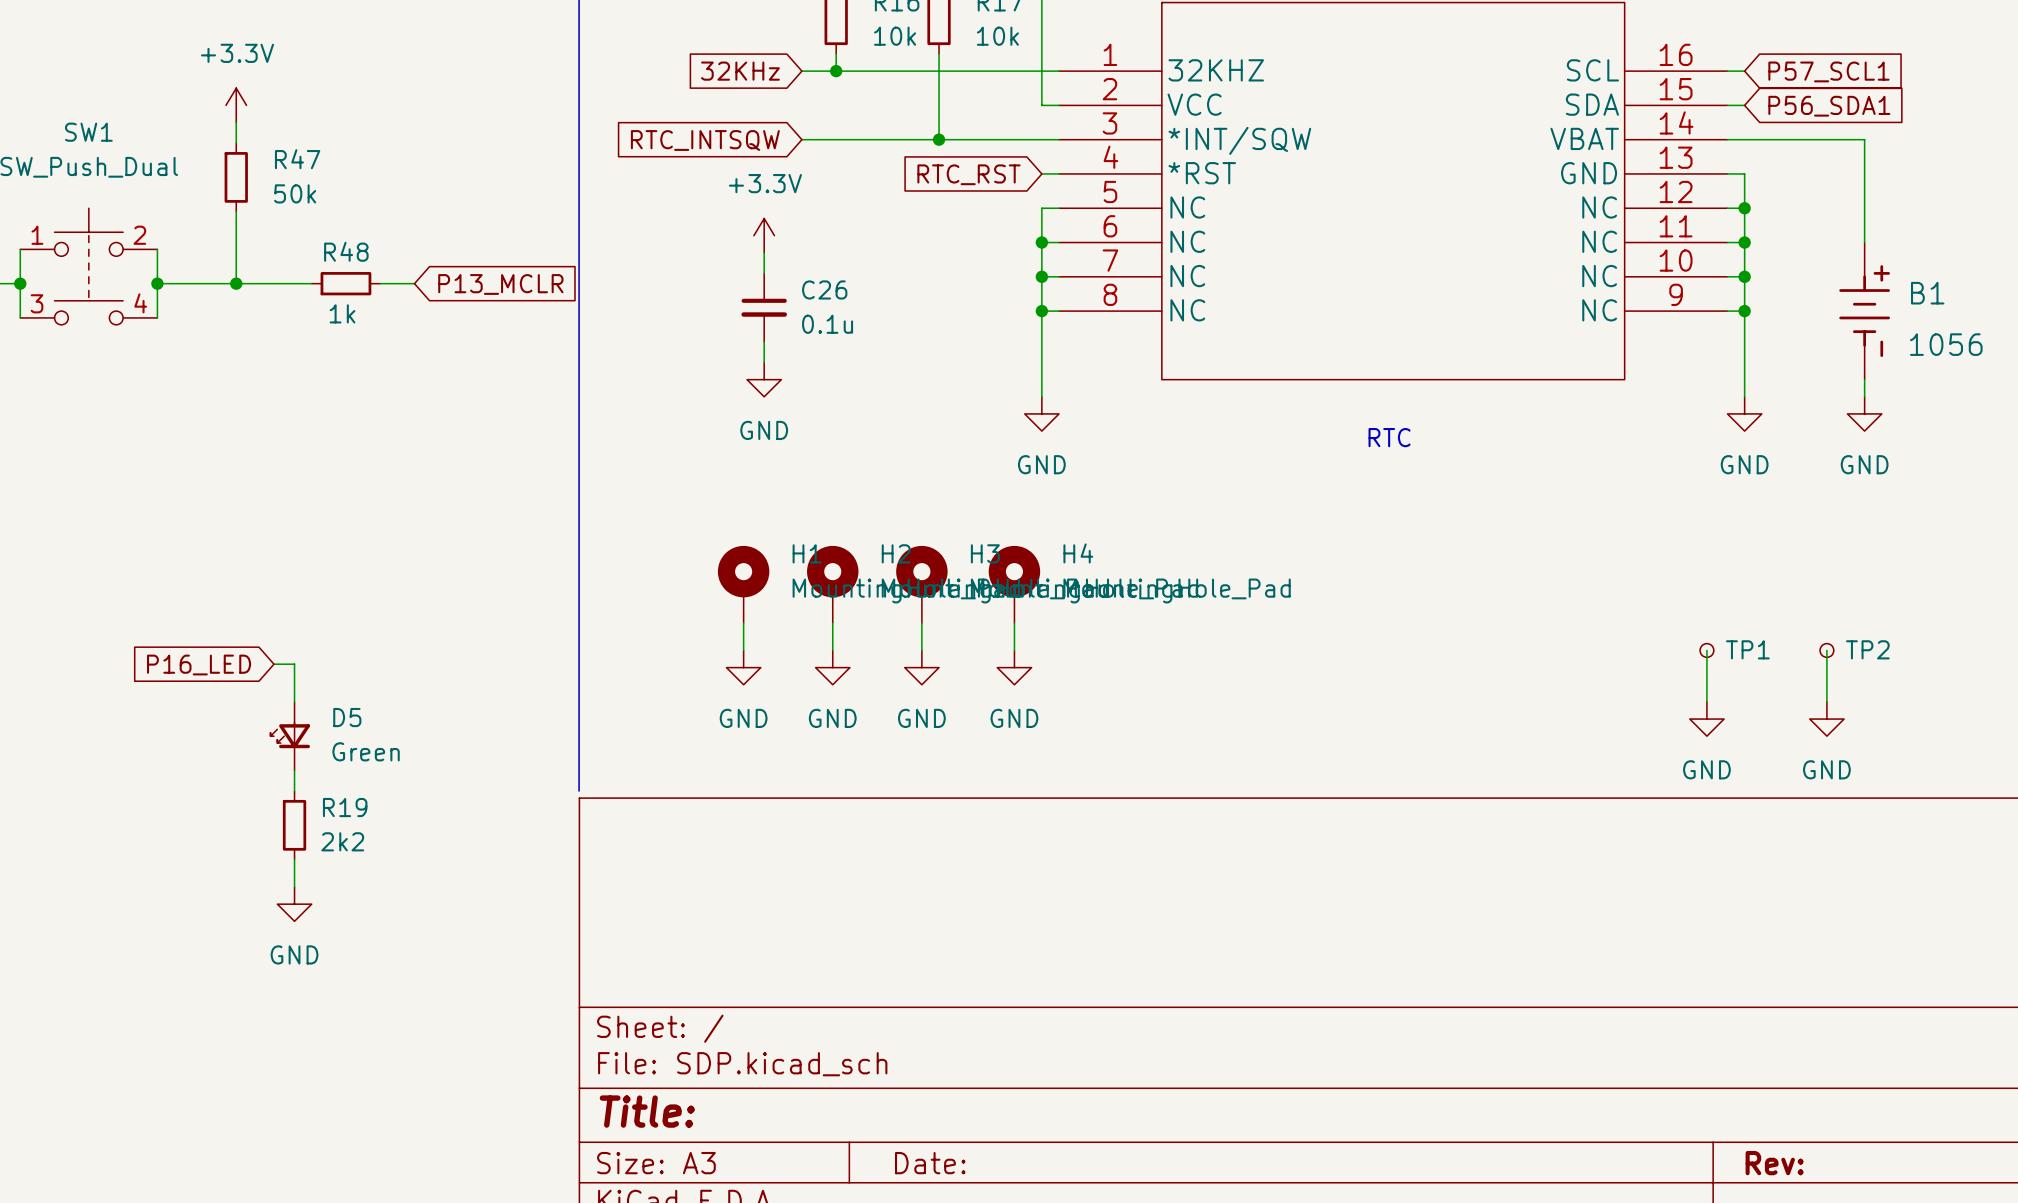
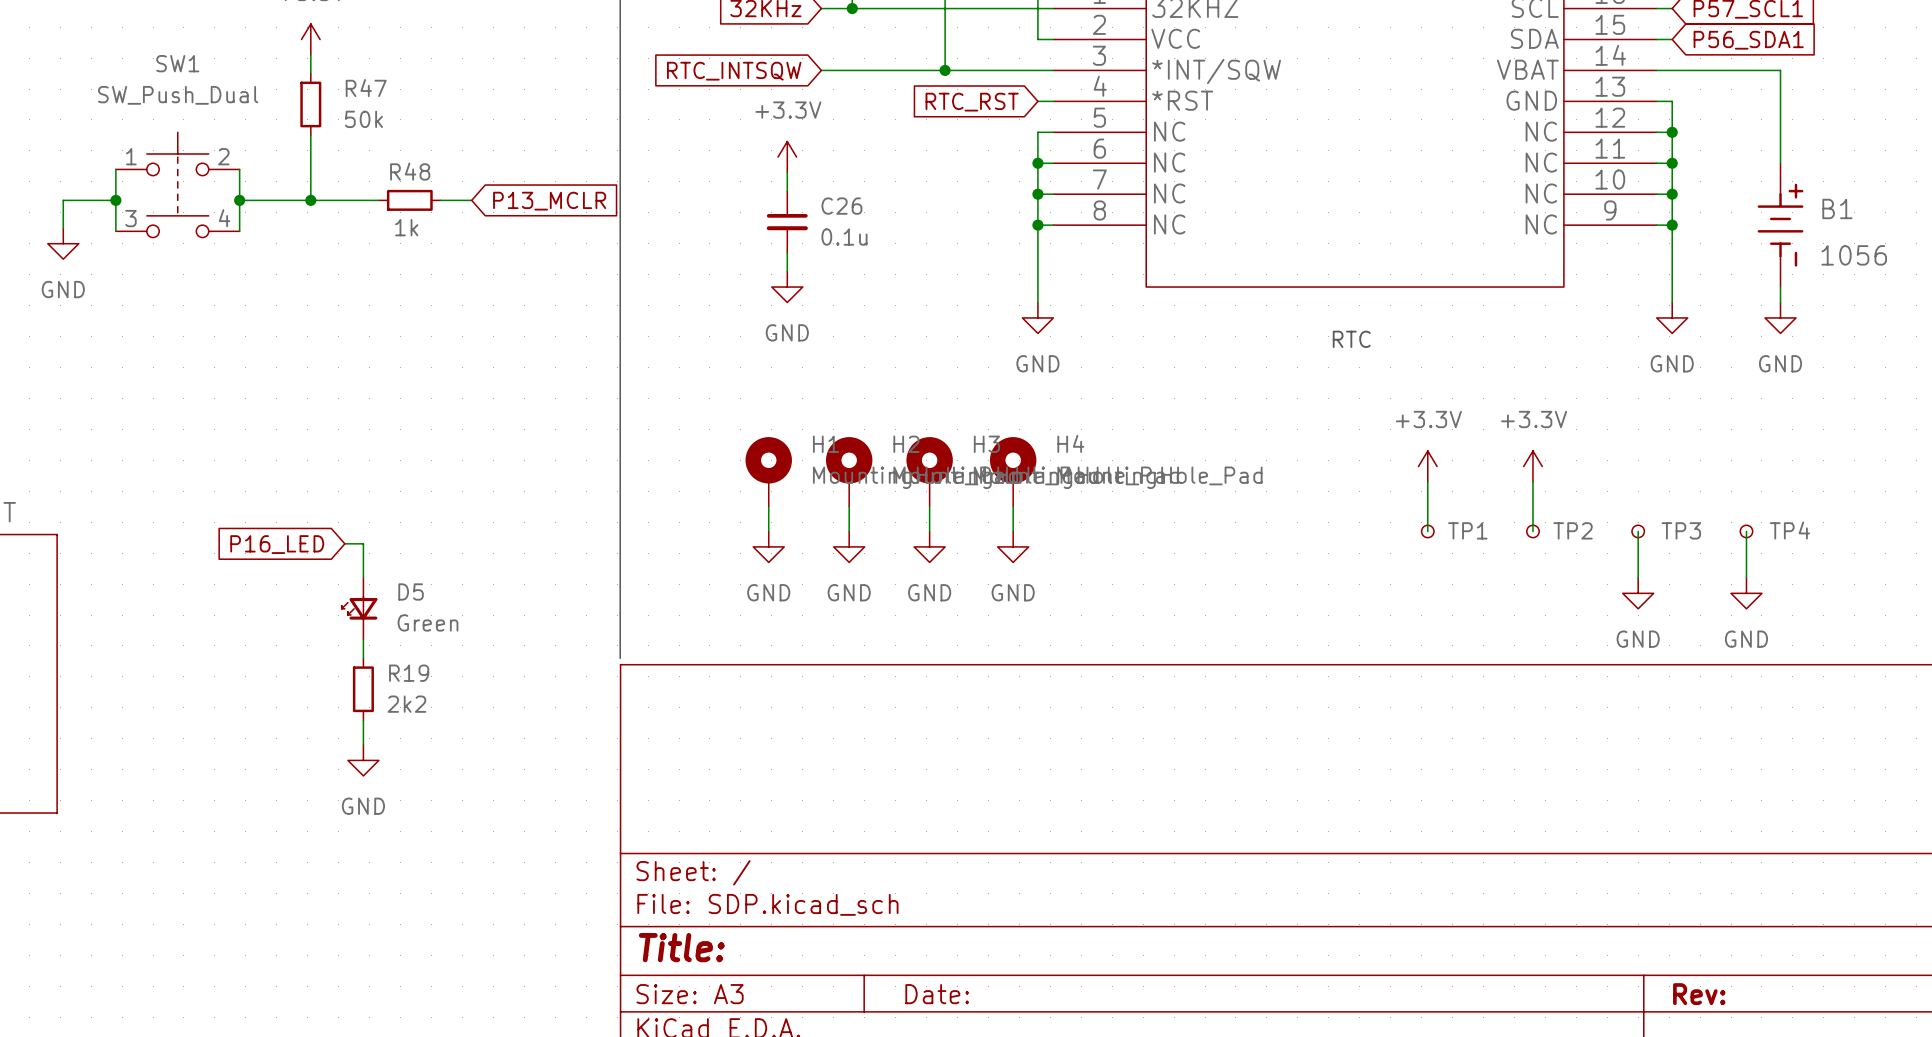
power symbol: none -> +3.3V (1427, 466)
power symbol: none -> +3.3V (1532, 466)
wire: none -> (1427, 481) (1427, 531)
wire: none -> (1532, 481) (1532, 531)
TP1 name: TP1 (1747, 649) -> TP3 (1681, 530)
TP2 name: TP2 (1867, 649) -> TP4 (1789, 530)
TP1: none -> (1427, 531)
TP2: none -> (1532, 531)

